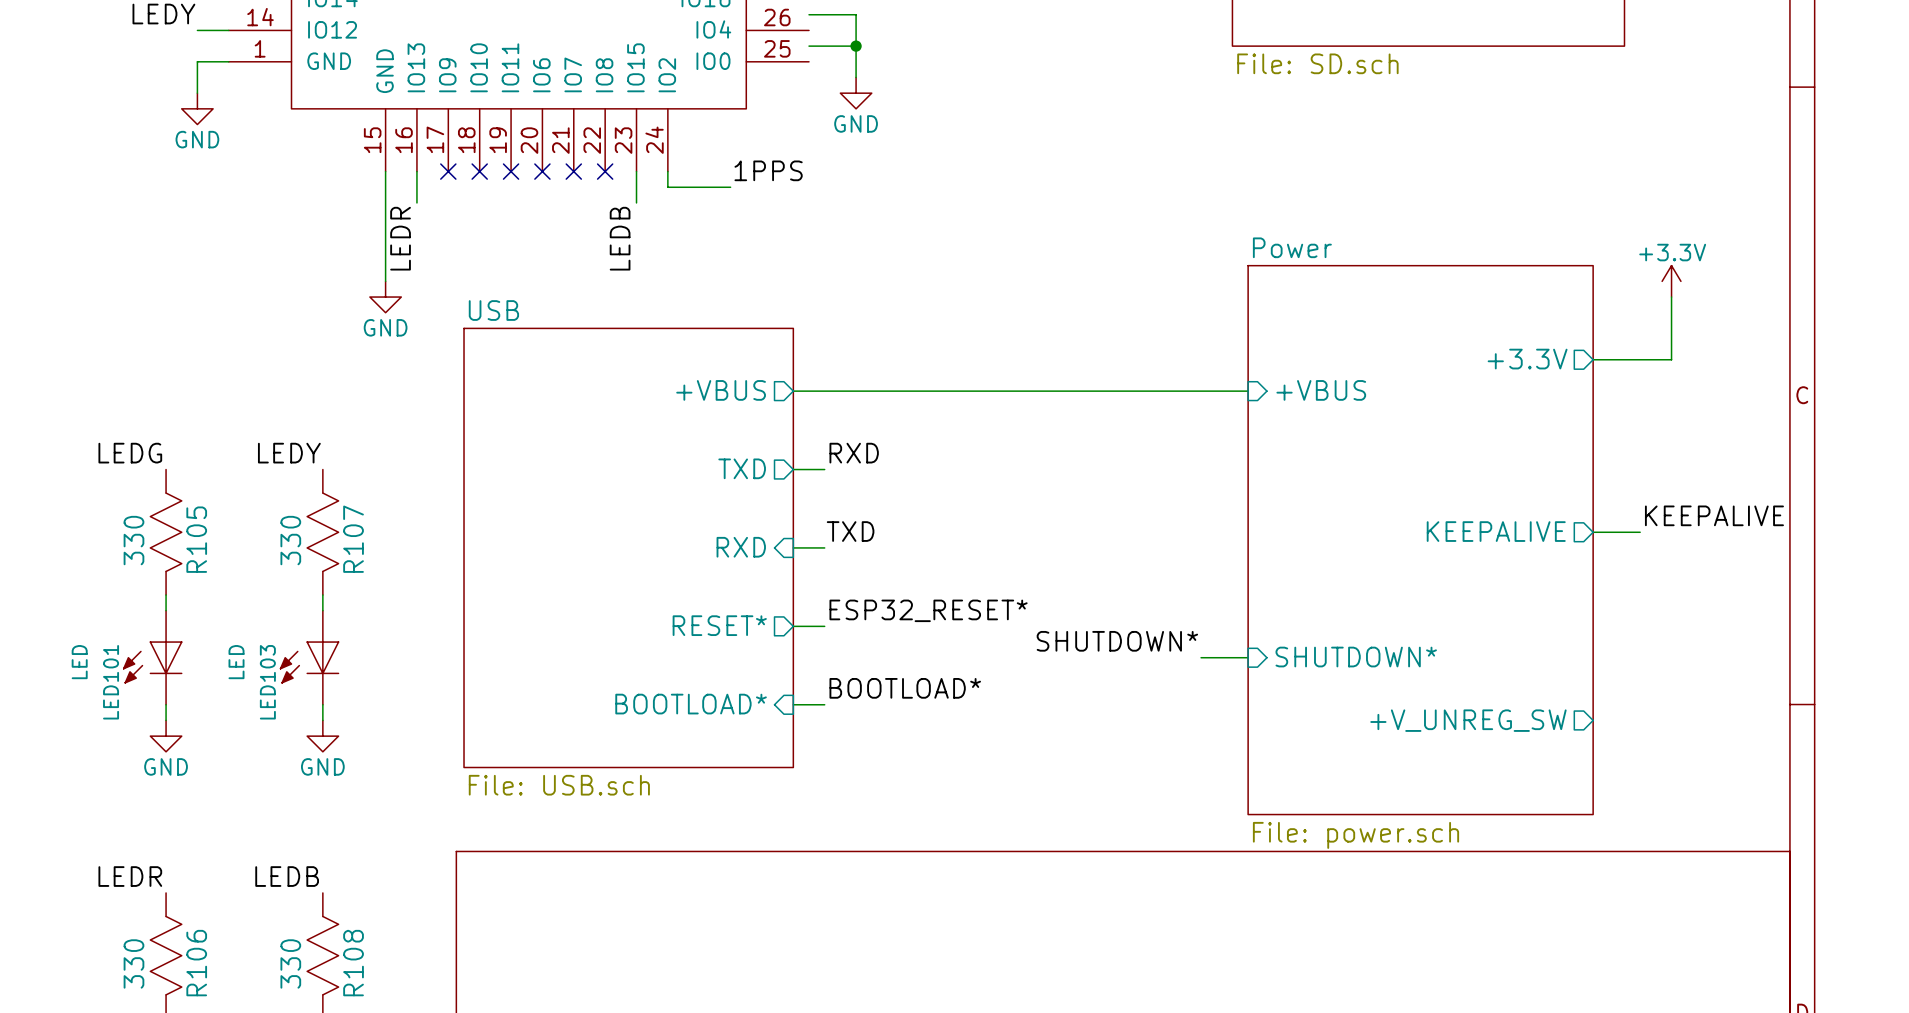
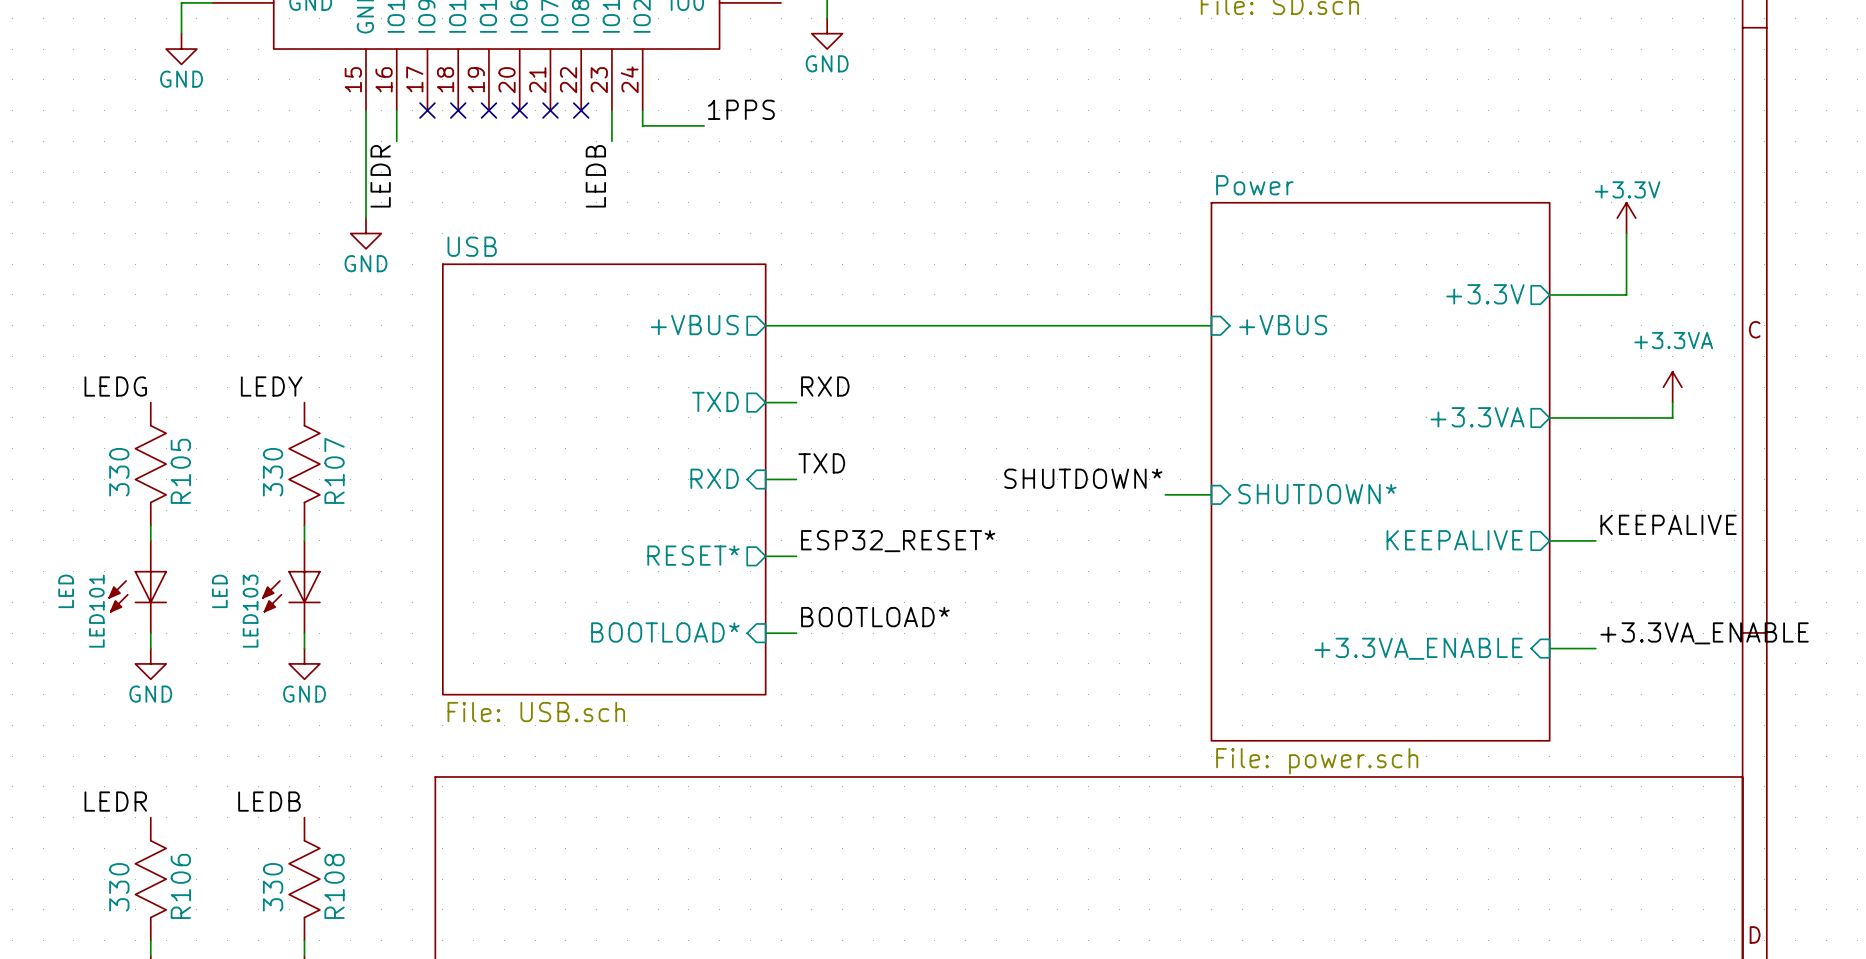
power symbol: none -> +3.3VA (1672, 387)
wire: none -> (1672, 402) (1672, 417) (1549, 417)
sheet pin: none -> +3.3VA (1477, 417)
label position: KEEPALIVE (1714, 515) -> KEEPALIVE (1668, 524)
sheet pin position: KEEPALIVE (1496, 531) -> KEEPALIVE (1454, 540)
wire: (1593, 532) (1640, 532) -> (1549, 540) (1595, 540)
label position: SHUTDOWN* (1117, 641) -> SHUTDOWN* (1083, 478)
wire: (1201, 657) (1248, 657) -> (1165, 494) (1211, 494)
sheet pin position: SHUTDOWN* (1356, 657) -> SHUTDOWN* (1317, 494)
label: none -> +3.3VA_ENABLE (1704, 633)
sheet pin shape: output (1468, 720) -> input (1418, 648)
sheet pin: +V_UNREG_SW (1468, 720) -> +3.3VA_ENABLE (1418, 648)
wire: none -> (1549, 648) (1595, 648)

